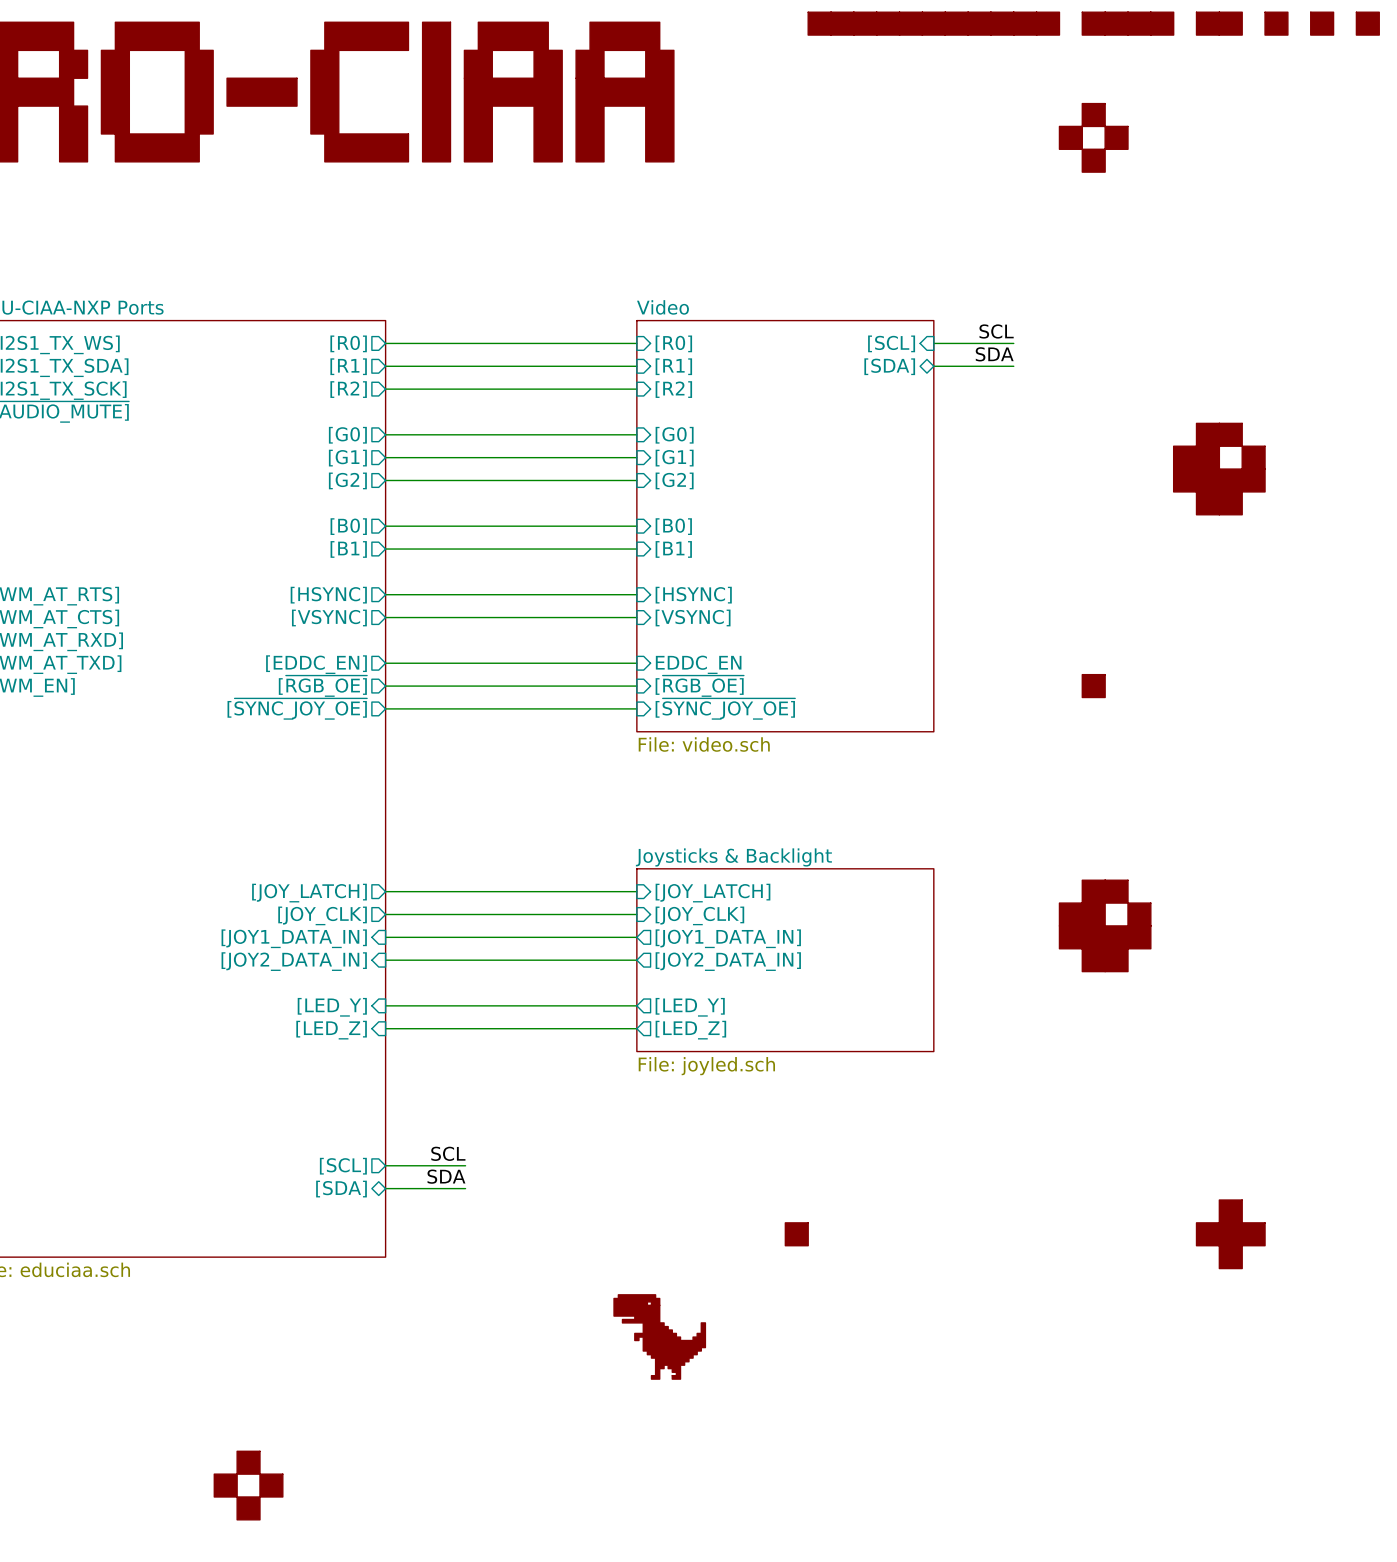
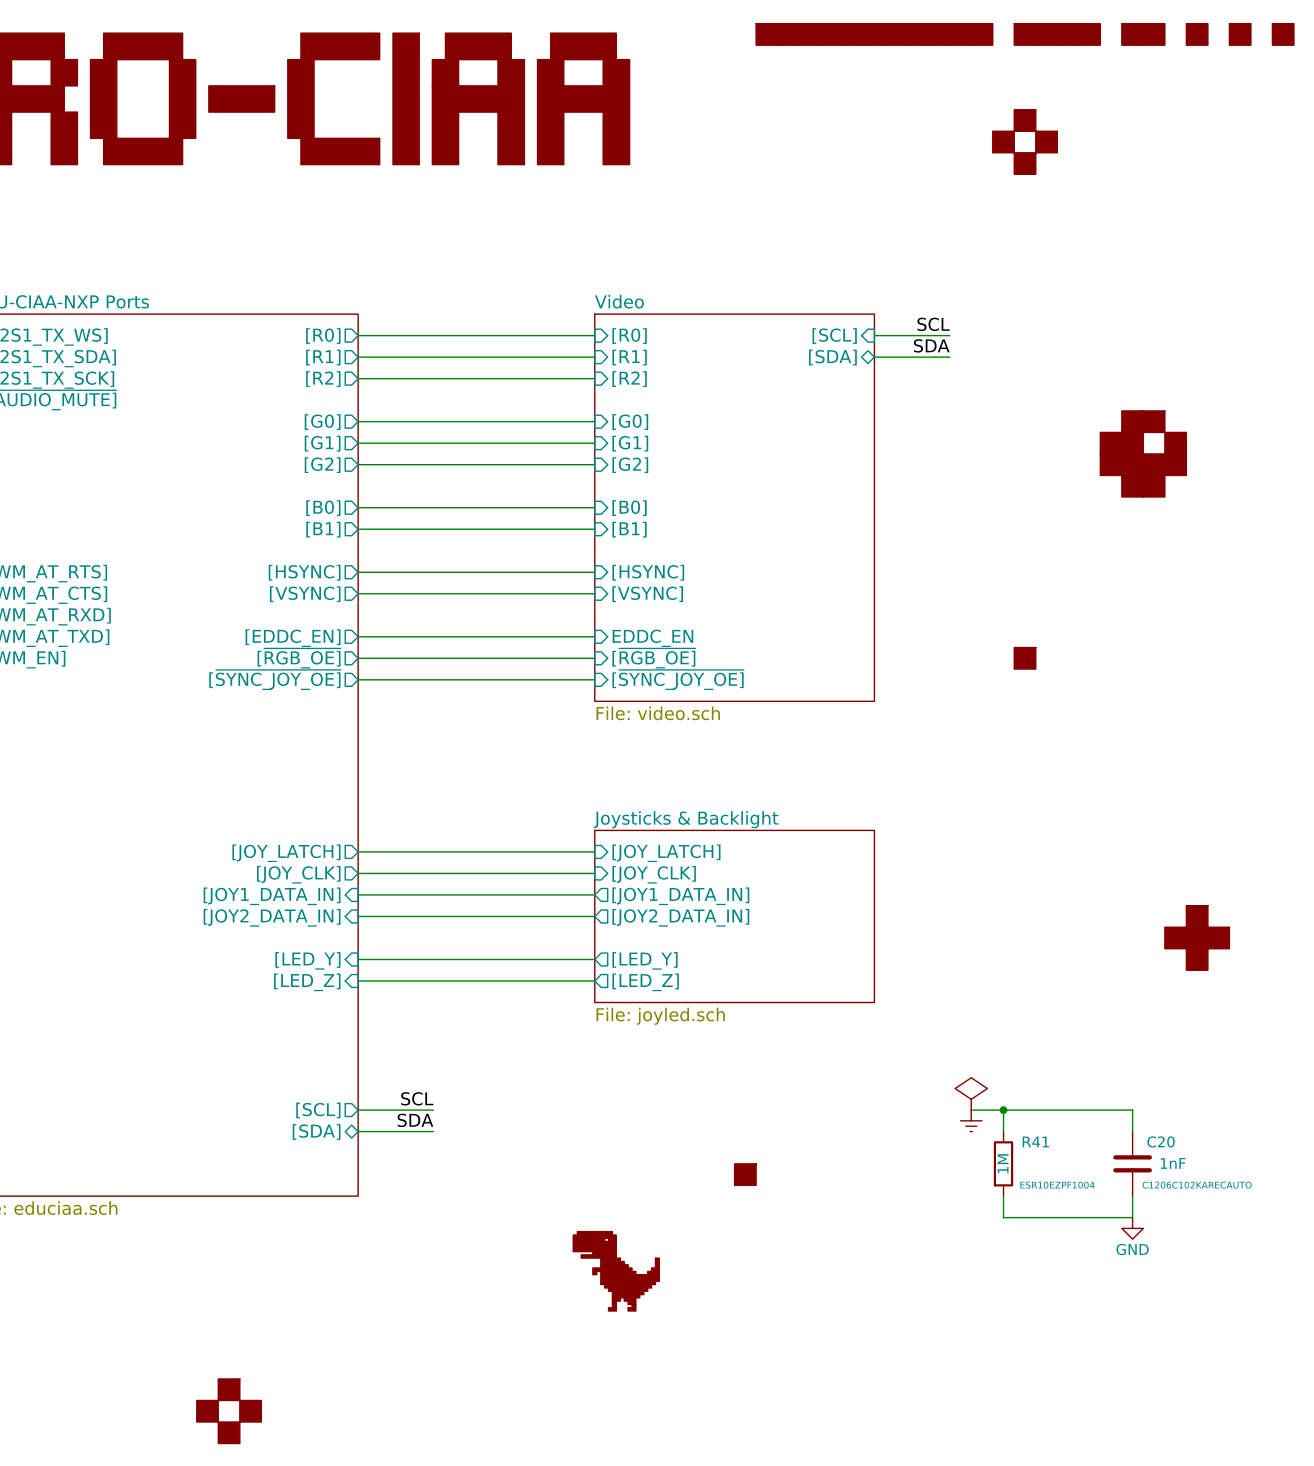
power symbol: (1093, 891) -> none
power symbol: (1116, 891) -> none
power symbol: (1070, 914) -> none
power symbol: (1093, 914) -> none
power symbol: (1139, 914) -> none
power symbol: (1070, 937) -> none
power symbol: (1093, 937) -> none
power symbol: (1116, 937) -> none
power symbol: (1139, 937) -> none
power symbol: (1093, 960) -> none
power symbol: (1116, 960) -> none
power symbol: none -> (1197, 916)
power symbol: none -> (1175, 937)
power symbol: none -> (1197, 937)
power symbol: none -> (1218, 937)
power symbol: none -> (1197, 959)
power symbol: none -> (971, 1093)
wire: none -> (971, 1110) (1132, 1110) (1132, 1131)
wire: none -> (1003, 1110) (1003, 1131)
junction: none -> (1003, 1110)
power symbol: none -> (971, 1120)
power symbol: (1230, 1211) -> none
R41: none -> 1M (1003, 1163)
C20: none -> 1nF (1132, 1163)
power symbol: (1207, 1234) -> none
power symbol: (1230, 1234) -> none
power symbol: (1253, 1234) -> none
wire: none -> (1003, 1196) (1003, 1217) (1132, 1217) (1132, 1196)
power symbol: (1230, 1257) -> none
power symbol: none -> GND (1132, 1228)

